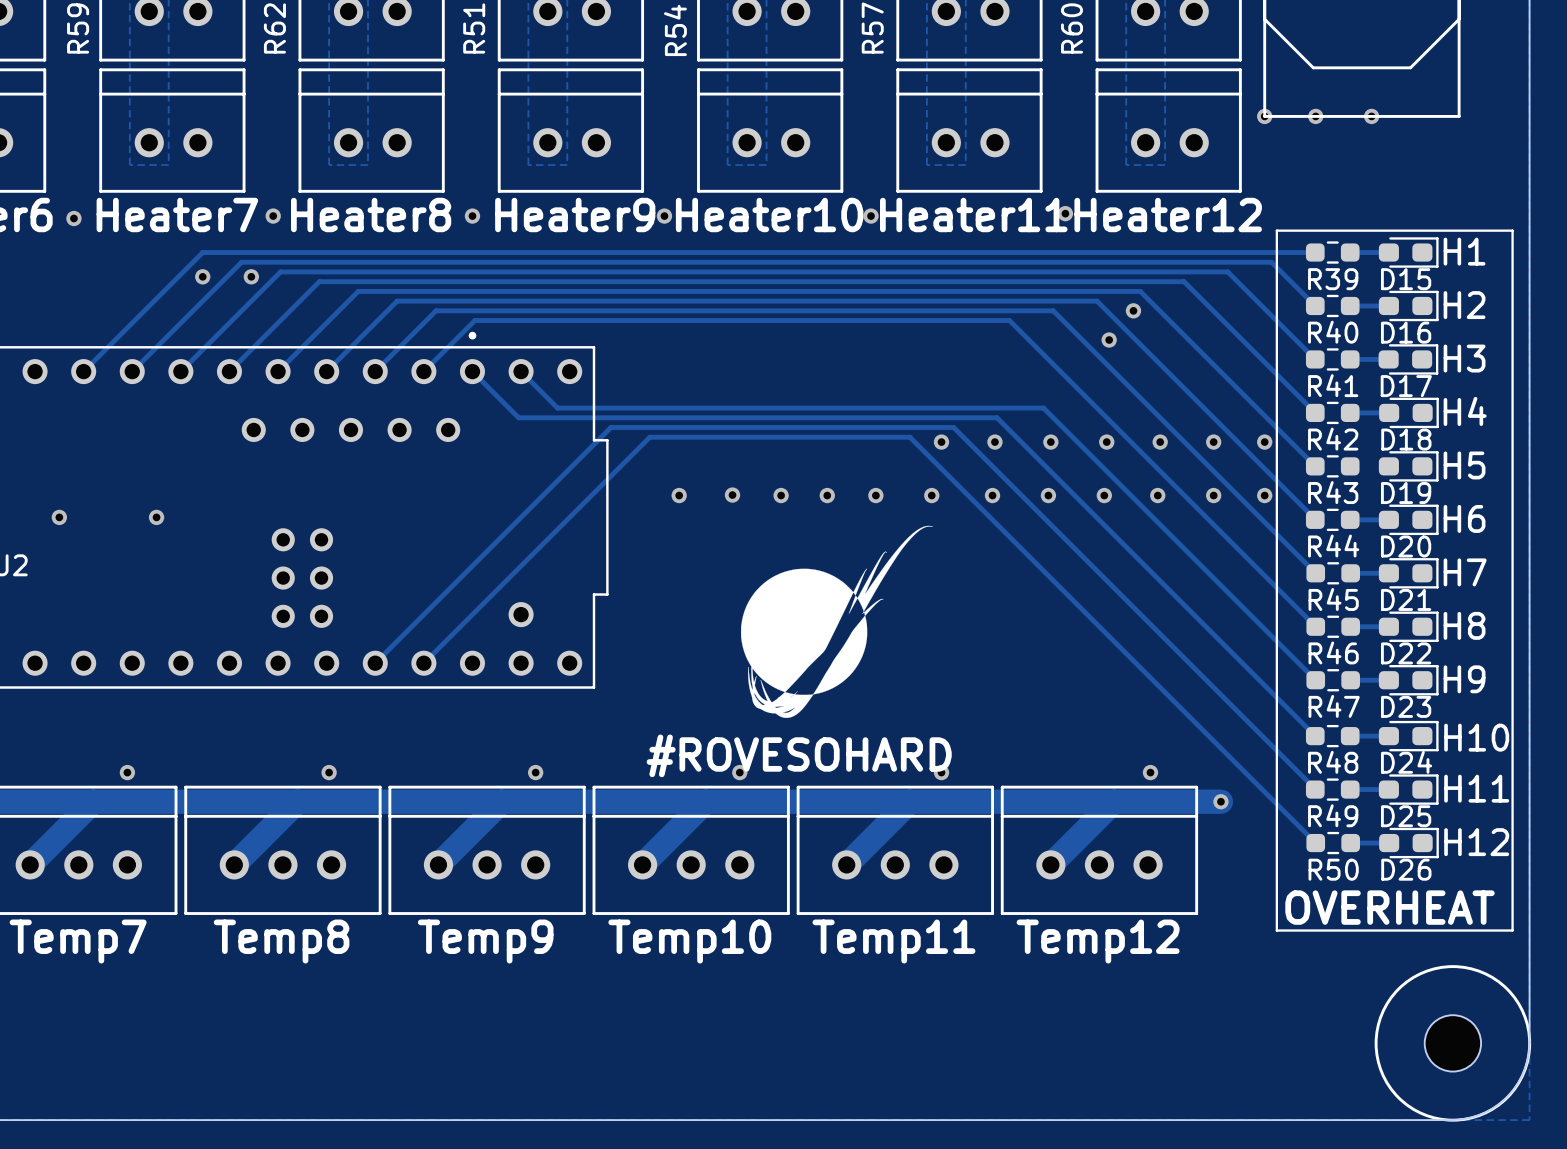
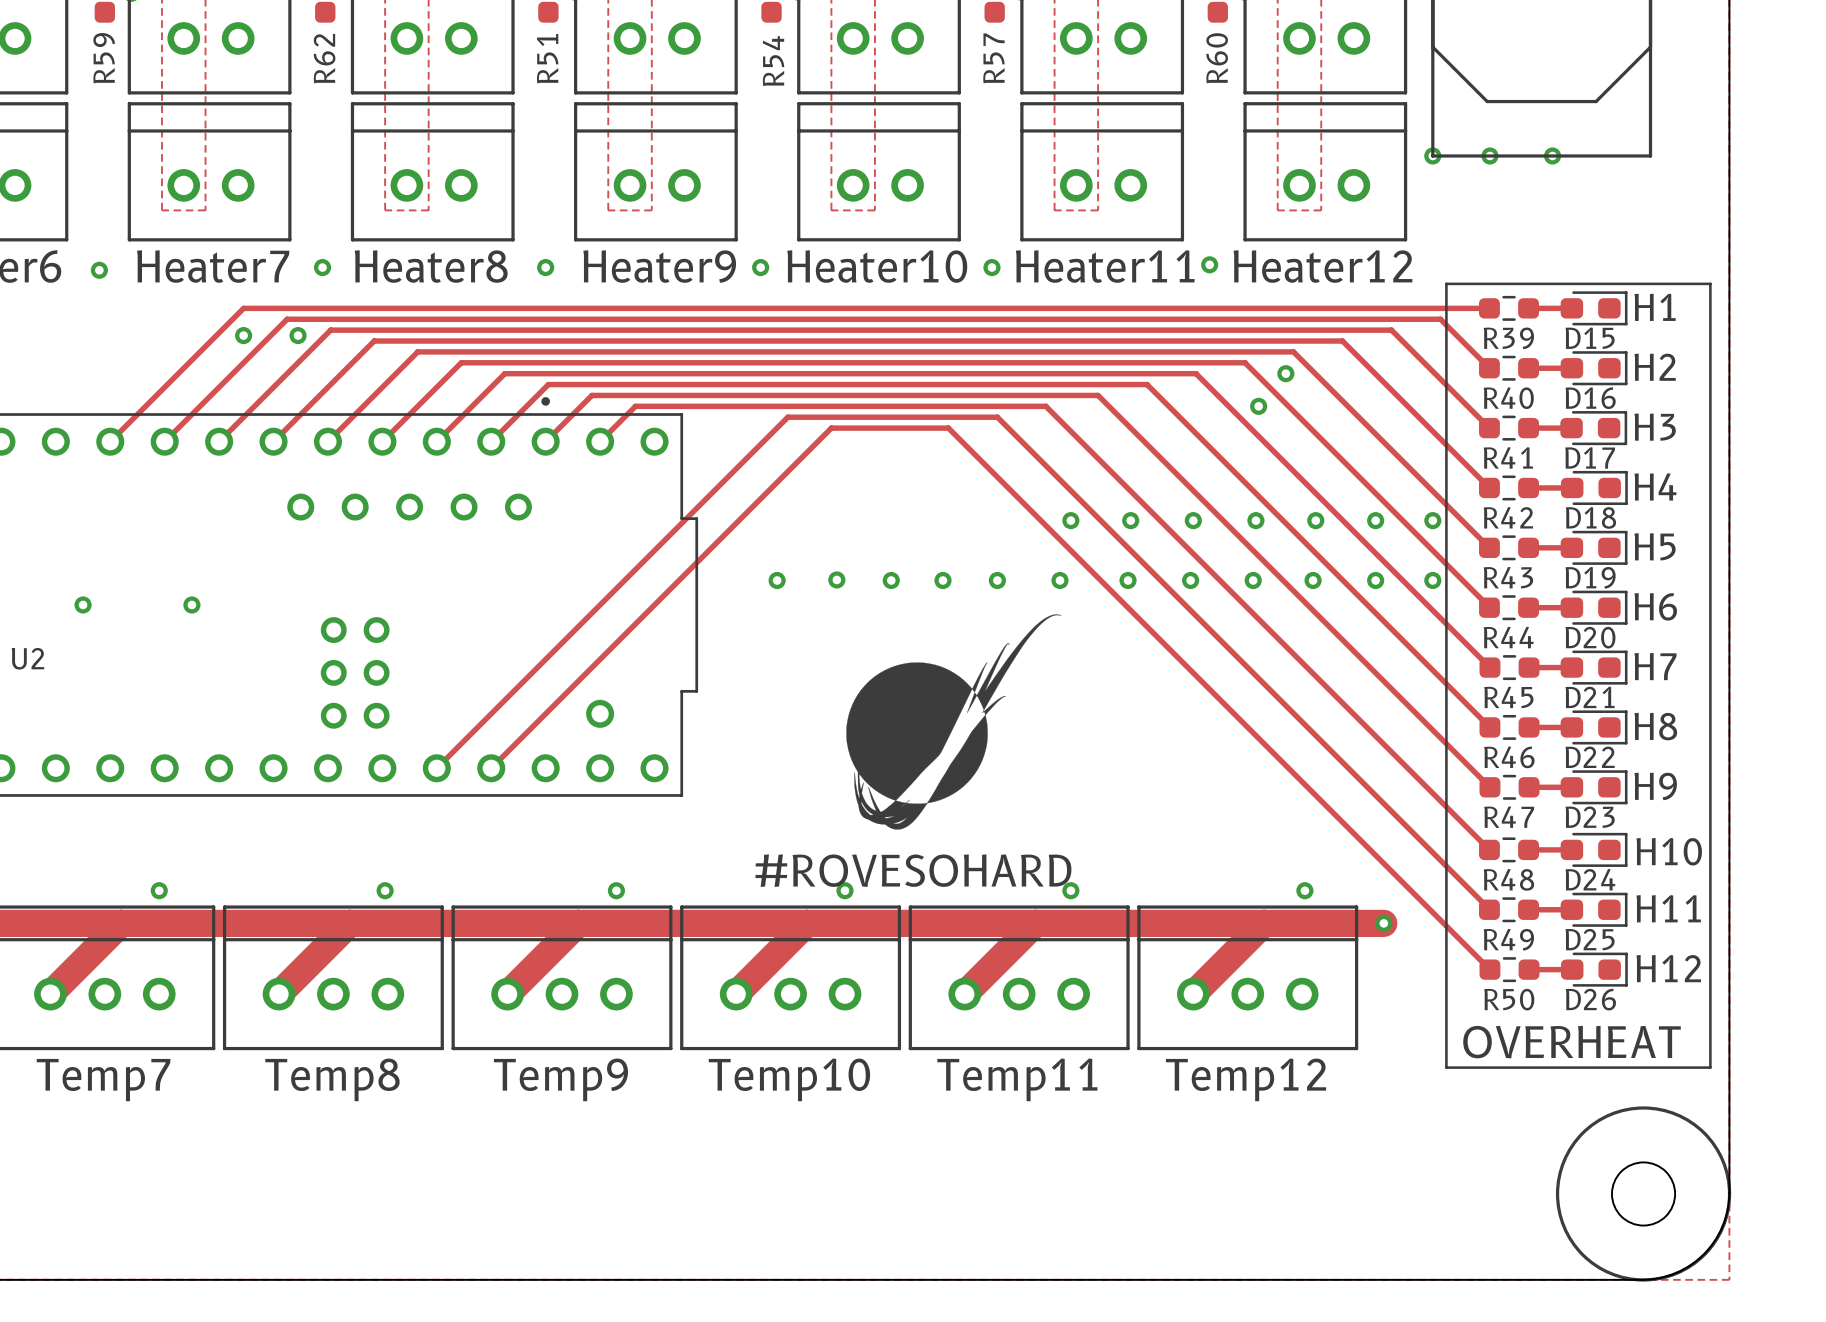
track: (472, 371) (518, 417) (996, 417) -> (545, 441) (591, 395) (1098, 395) (1185, 482)
track: (521, 371) (557, 408) (1043, 408) -> (600, 441) (635, 406) (1045, 406) (1132, 493)
track: (611, 427) (953, 427) -> (700, 504) (787, 417) (997, 417) (1084, 504)
track: (649, 437) (909, 437) -> (744, 515) (831, 428) (948, 428) (1035, 515)
track: none -> (1528, 547) (1571, 547)

